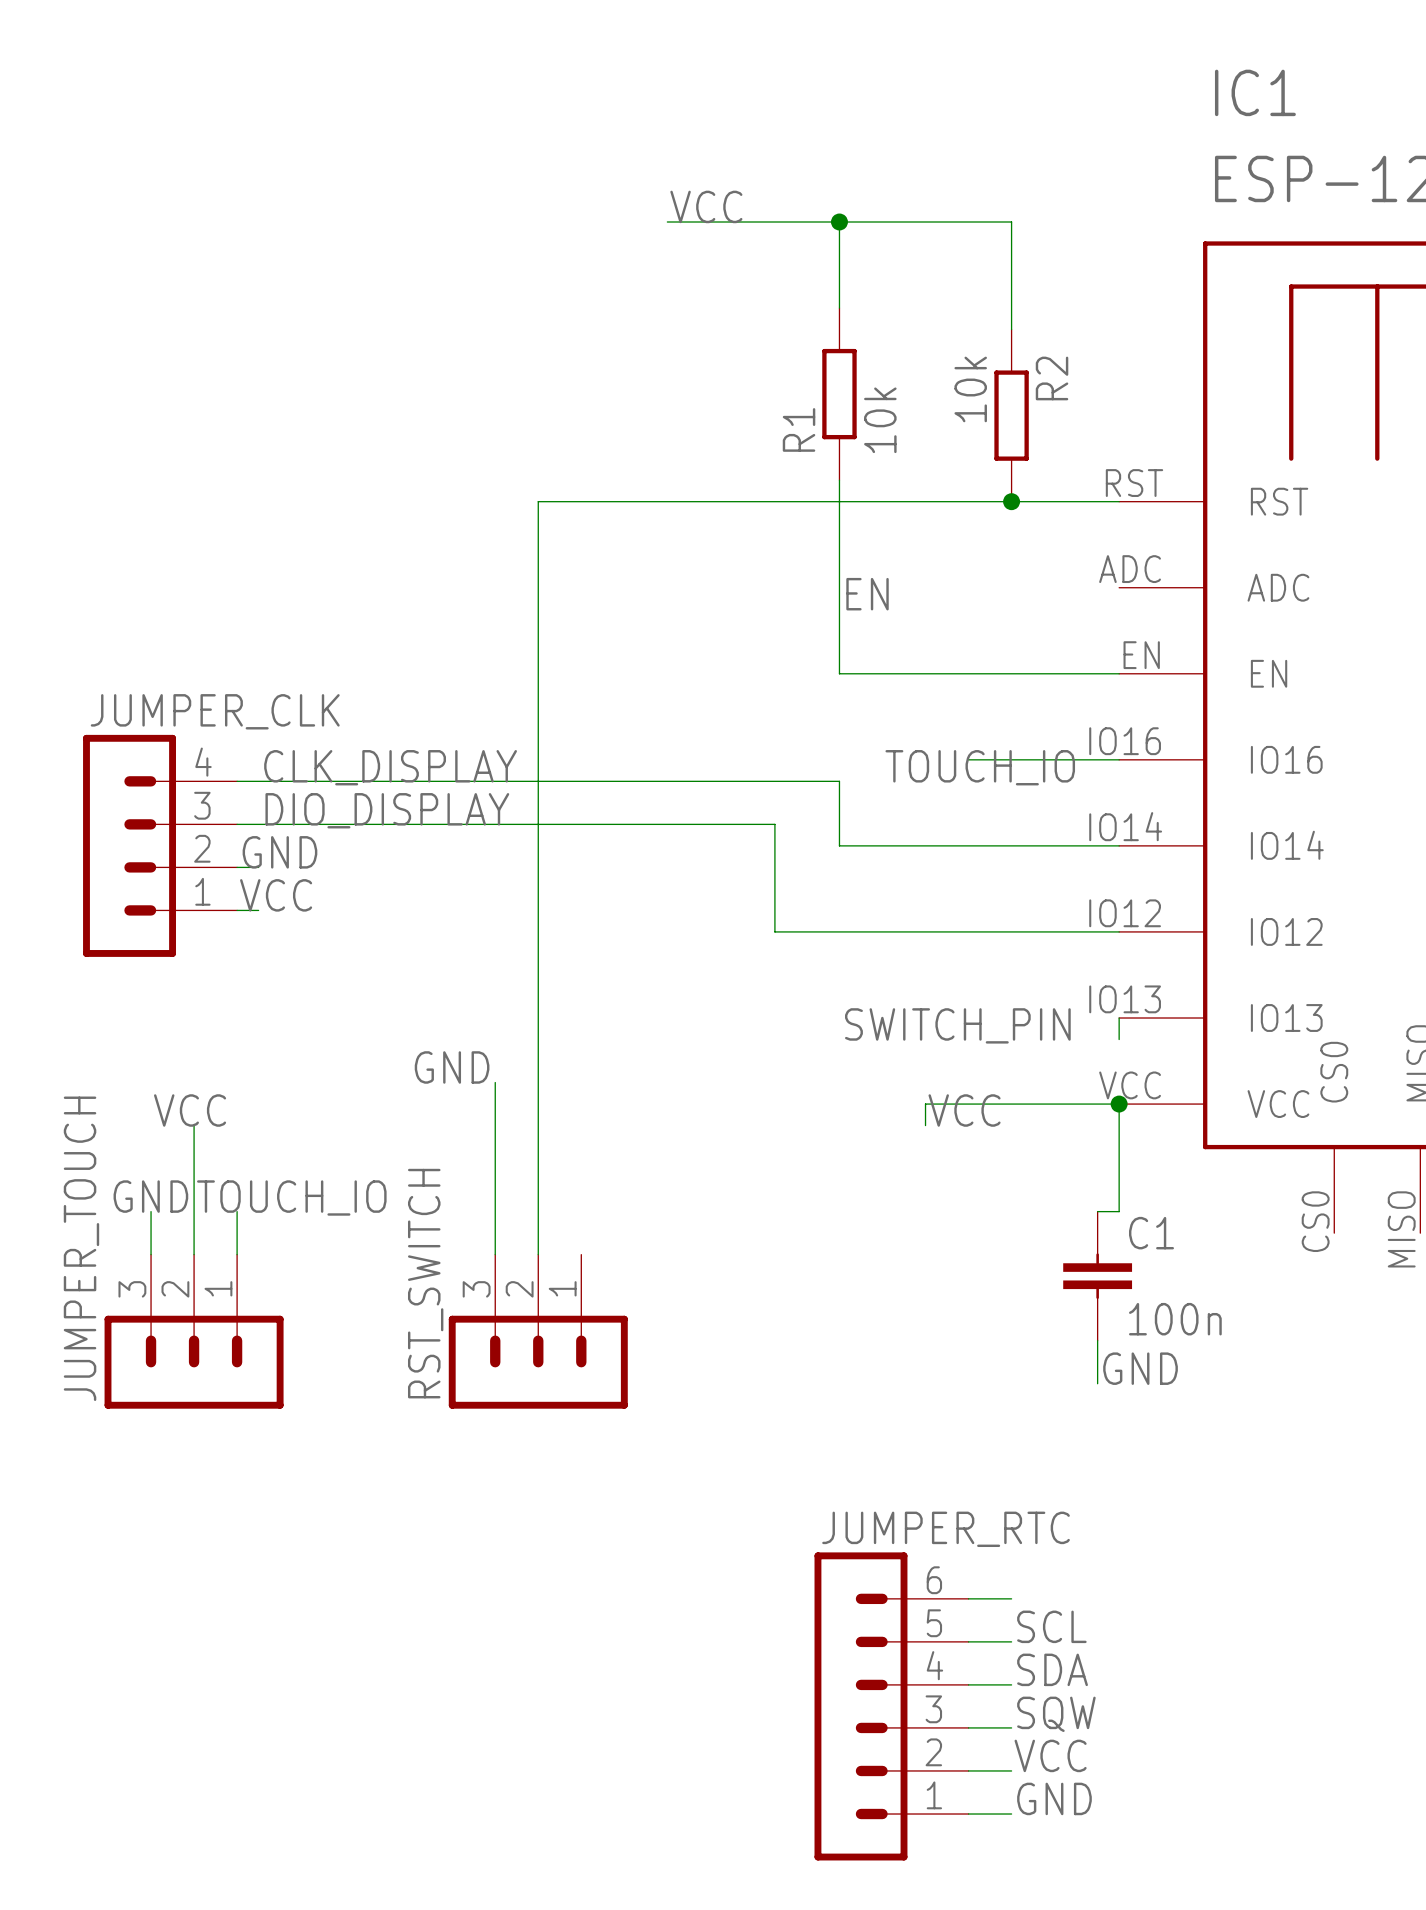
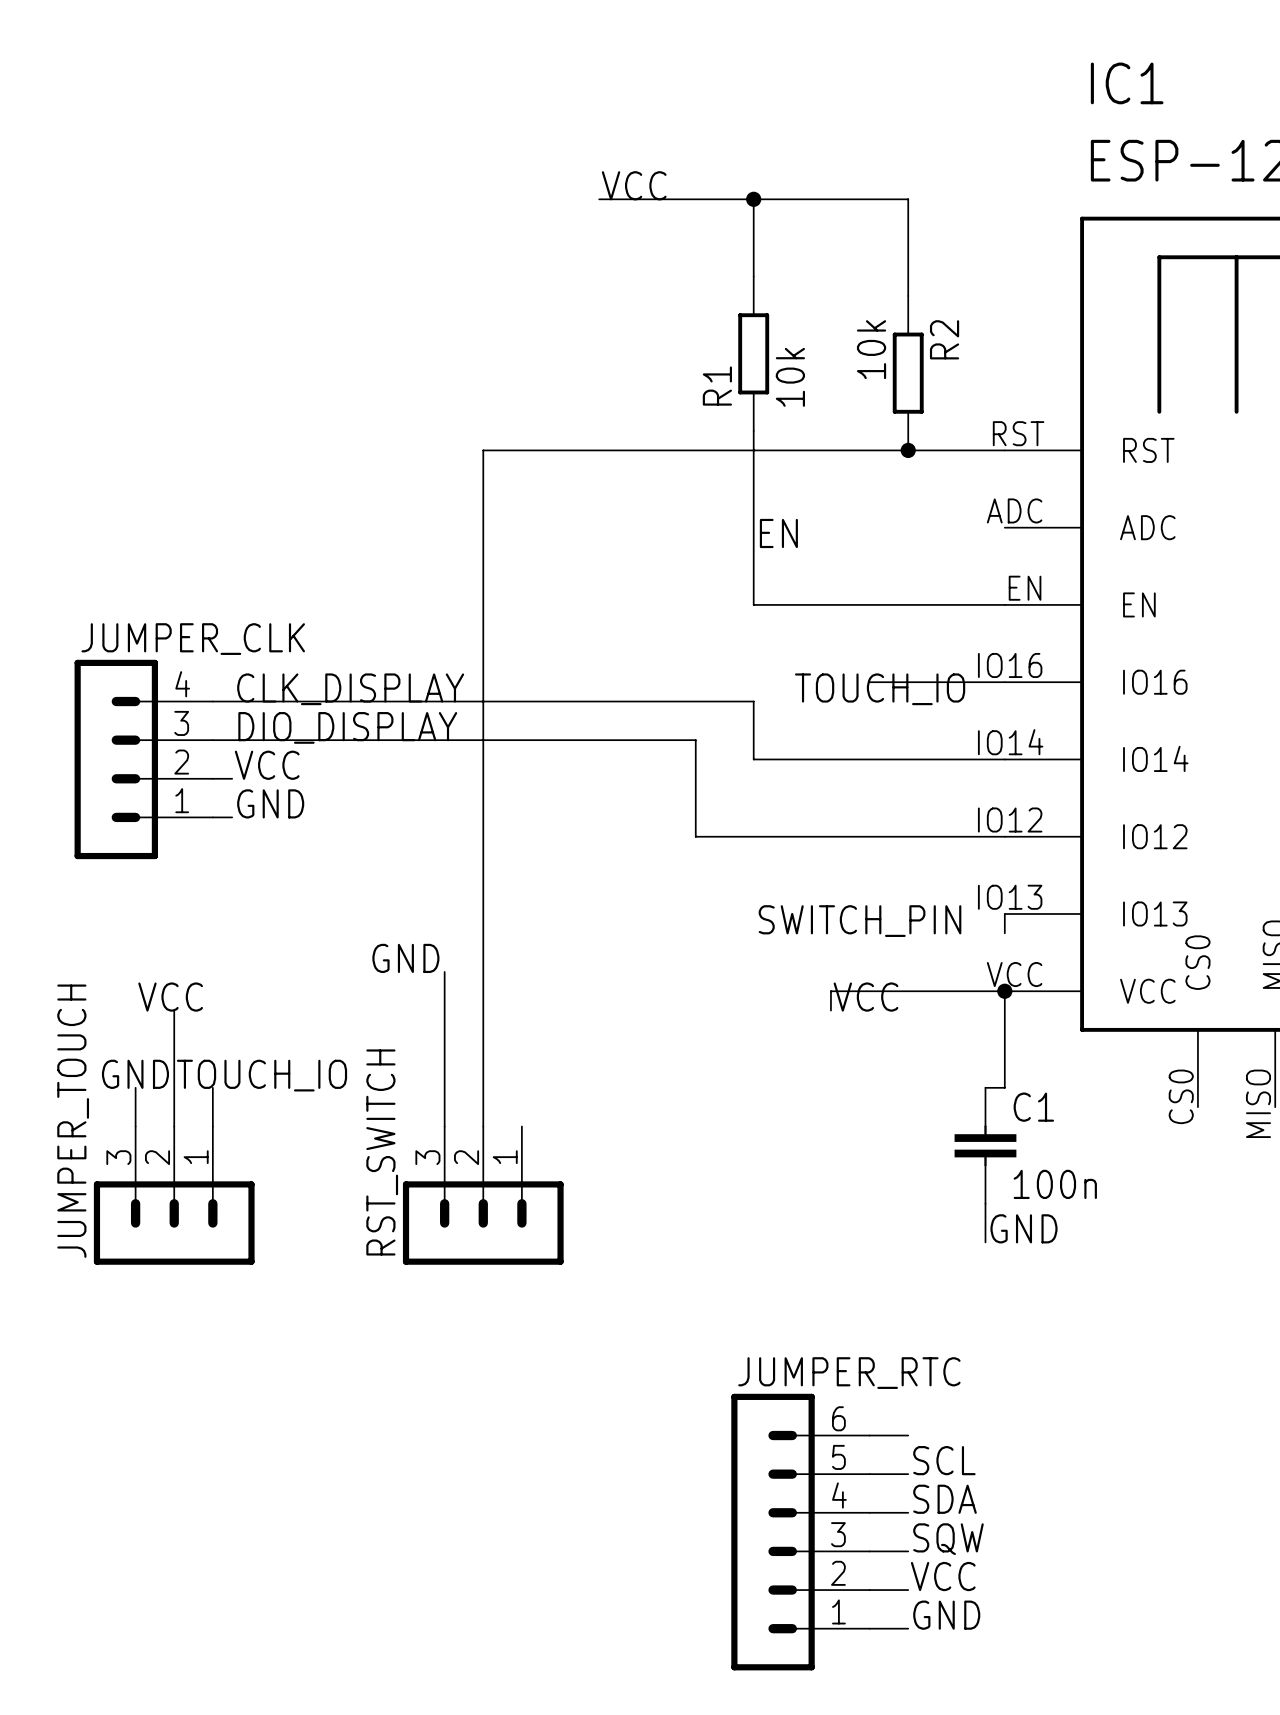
label position: GND (279, 852) -> GND (270, 803)
label position: VCC (276, 895) -> VCC (267, 765)

